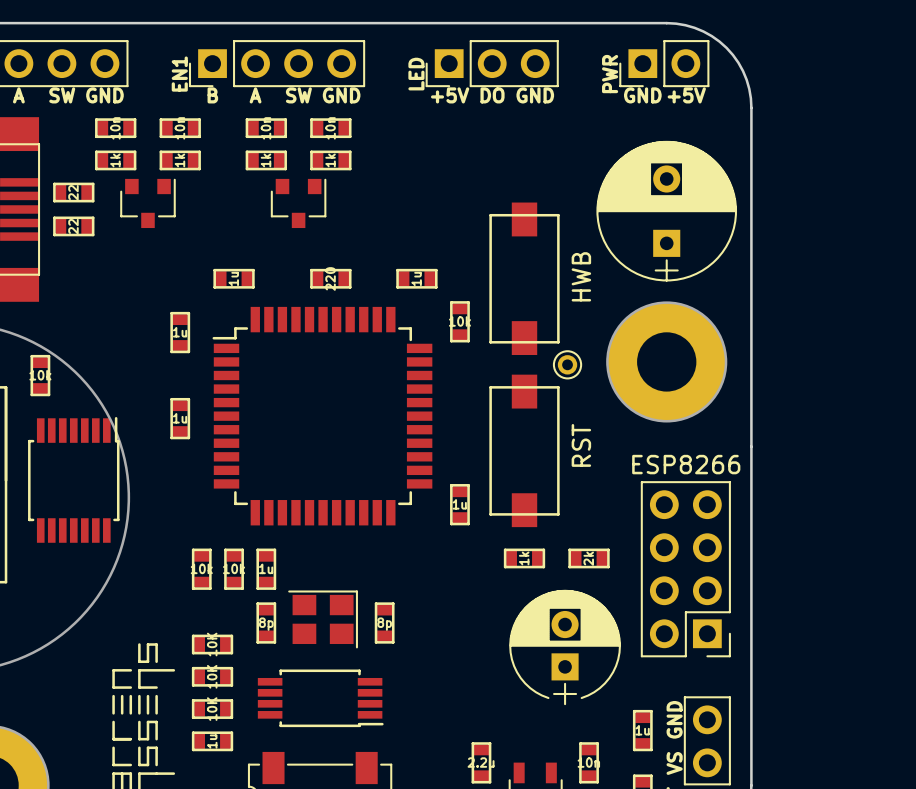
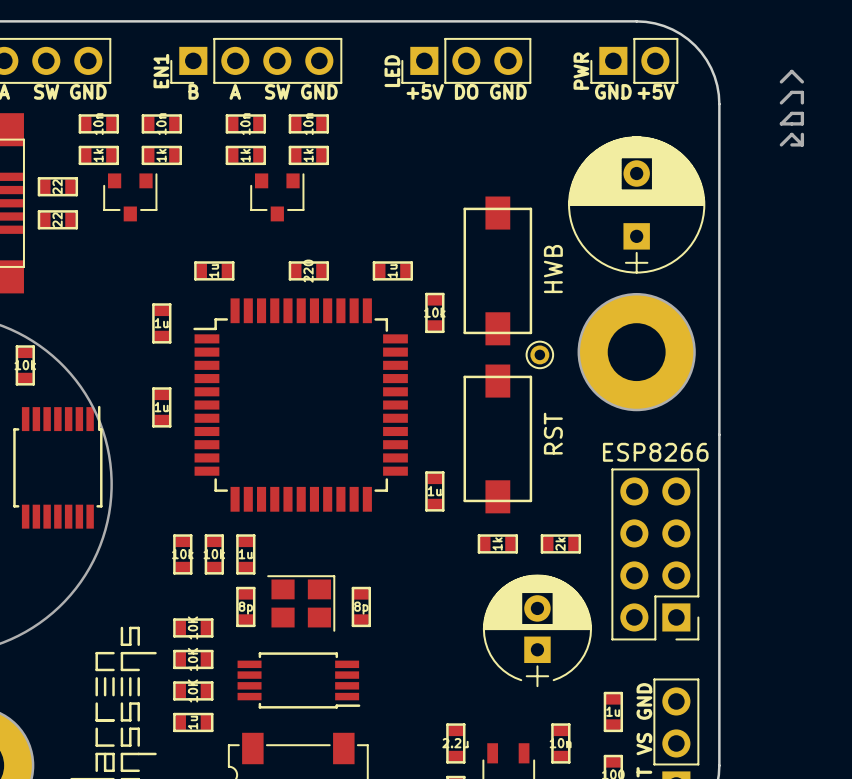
line: none -> (781, 81) (791, 71) (802, 81)
line: none -> (781, 102) (791, 92) (802, 92) (802, 102)
line: none -> (791, 113) (802, 113) (802, 123) (781, 123) (791, 113)
line: none -> (802, 134) (802, 144)
line: none -> (781, 144) (791, 134) (802, 144)
line: none -> (791, 144) (802, 144)

